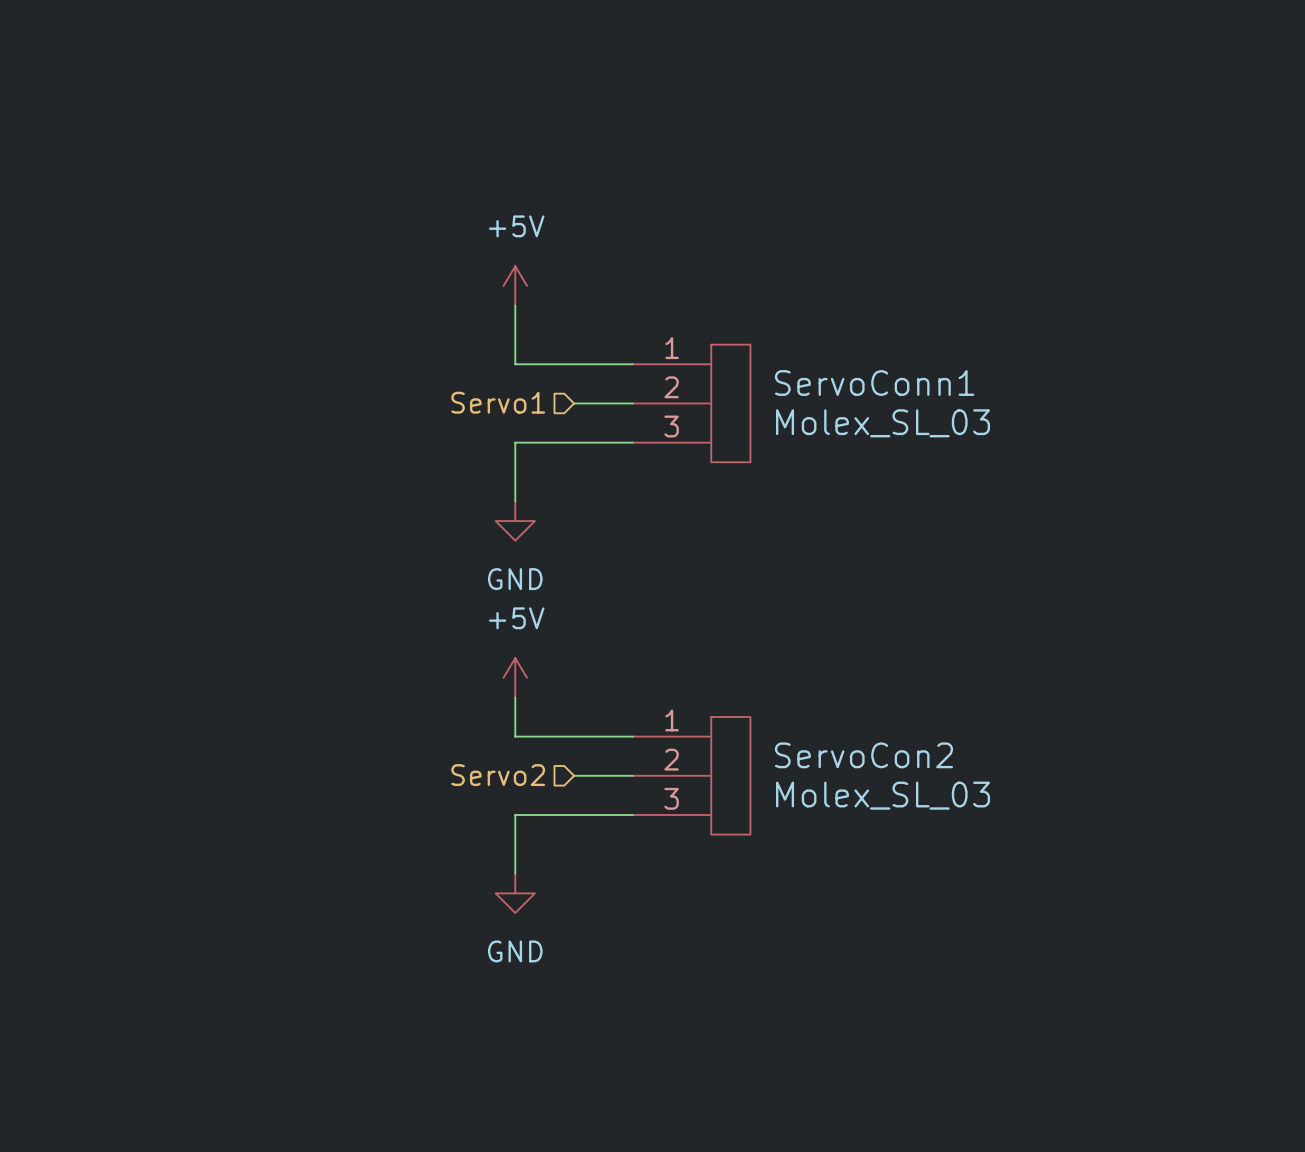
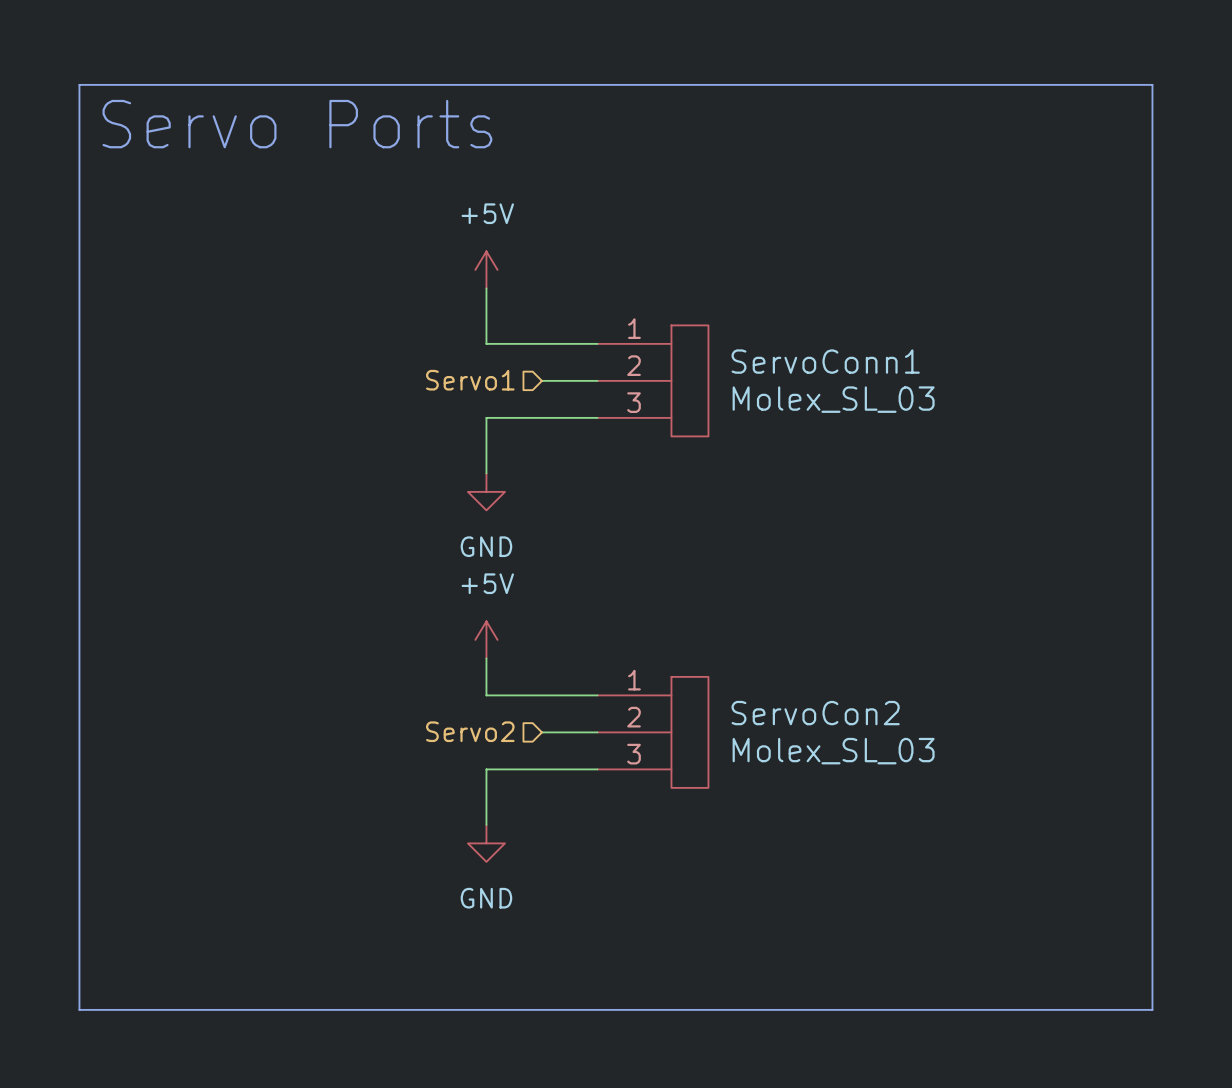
line: none -> (79, 84) (1152, 84) (1152, 1009) (79, 1009) (79, 84)
text: none -> Servo Ports (297, 124)

